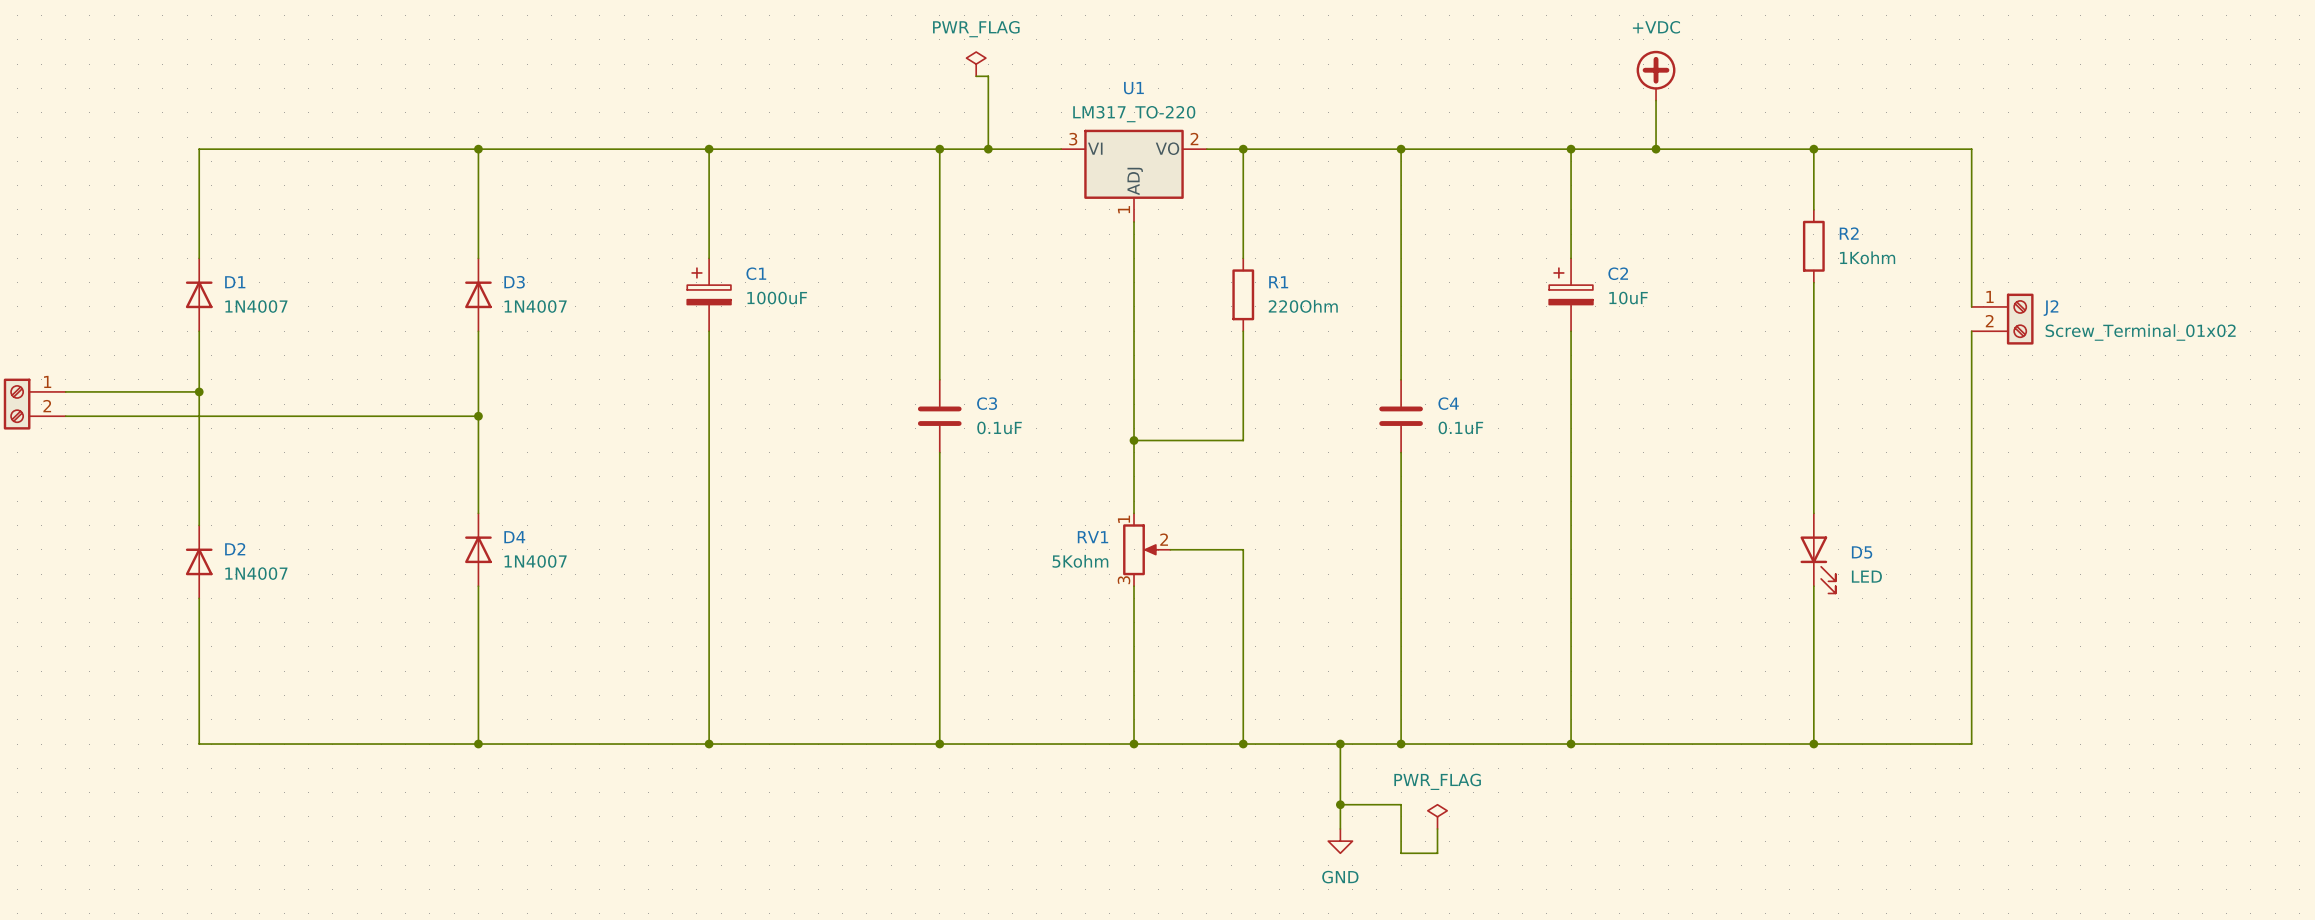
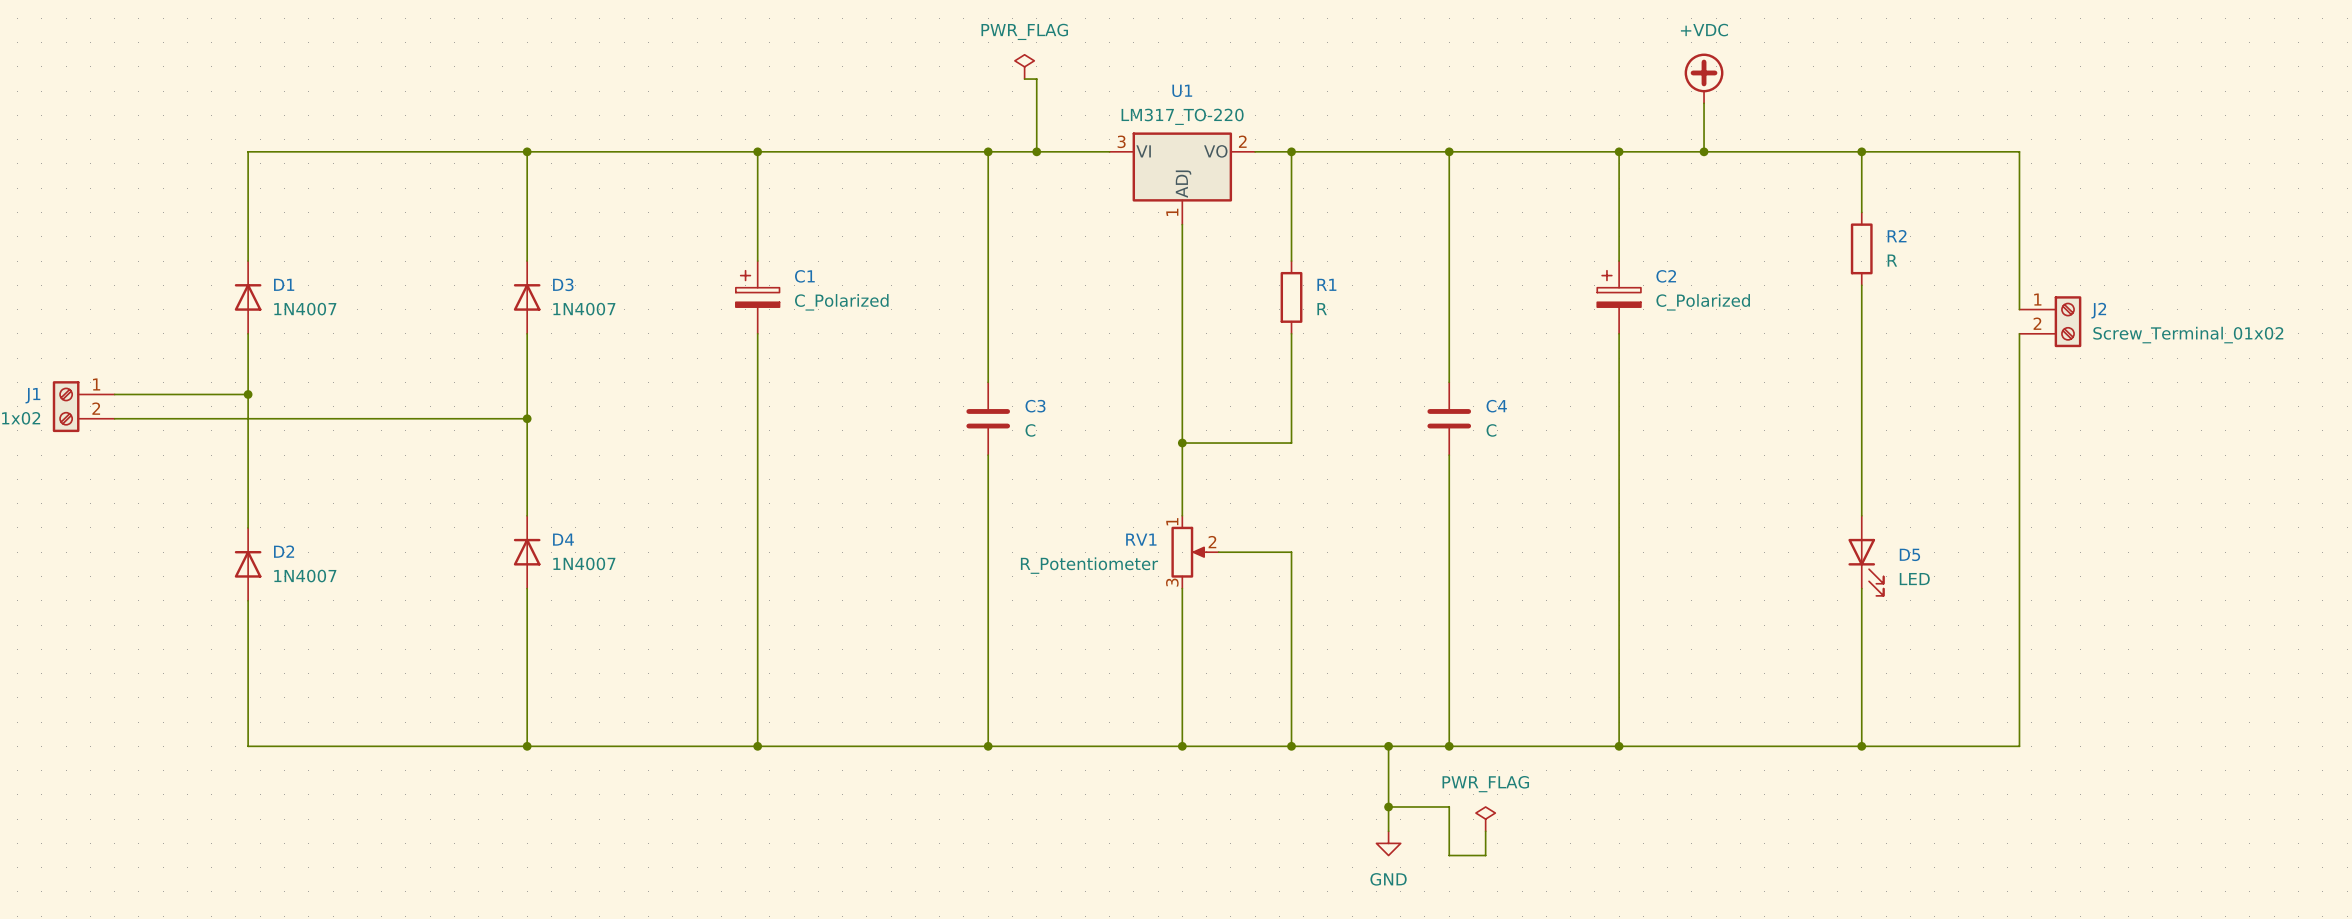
R2 value: 1Kohm (1867, 257) -> R (1892, 260)
C1 value: 1000uF (777, 298) -> C_Polarized (841, 302)
C2 value: 10uF (1628, 298) -> C_Polarized (1703, 302)
R1 value: 220Ohm (1303, 306) -> R (1322, 309)
C3 value: 0.1uF (999, 427) -> C (1030, 430)
C4 value: 0.1uF (1460, 427) -> C (1491, 430)
RV1 value: 5Kohm (1080, 561) -> R_Potentiometer (1089, 565)

